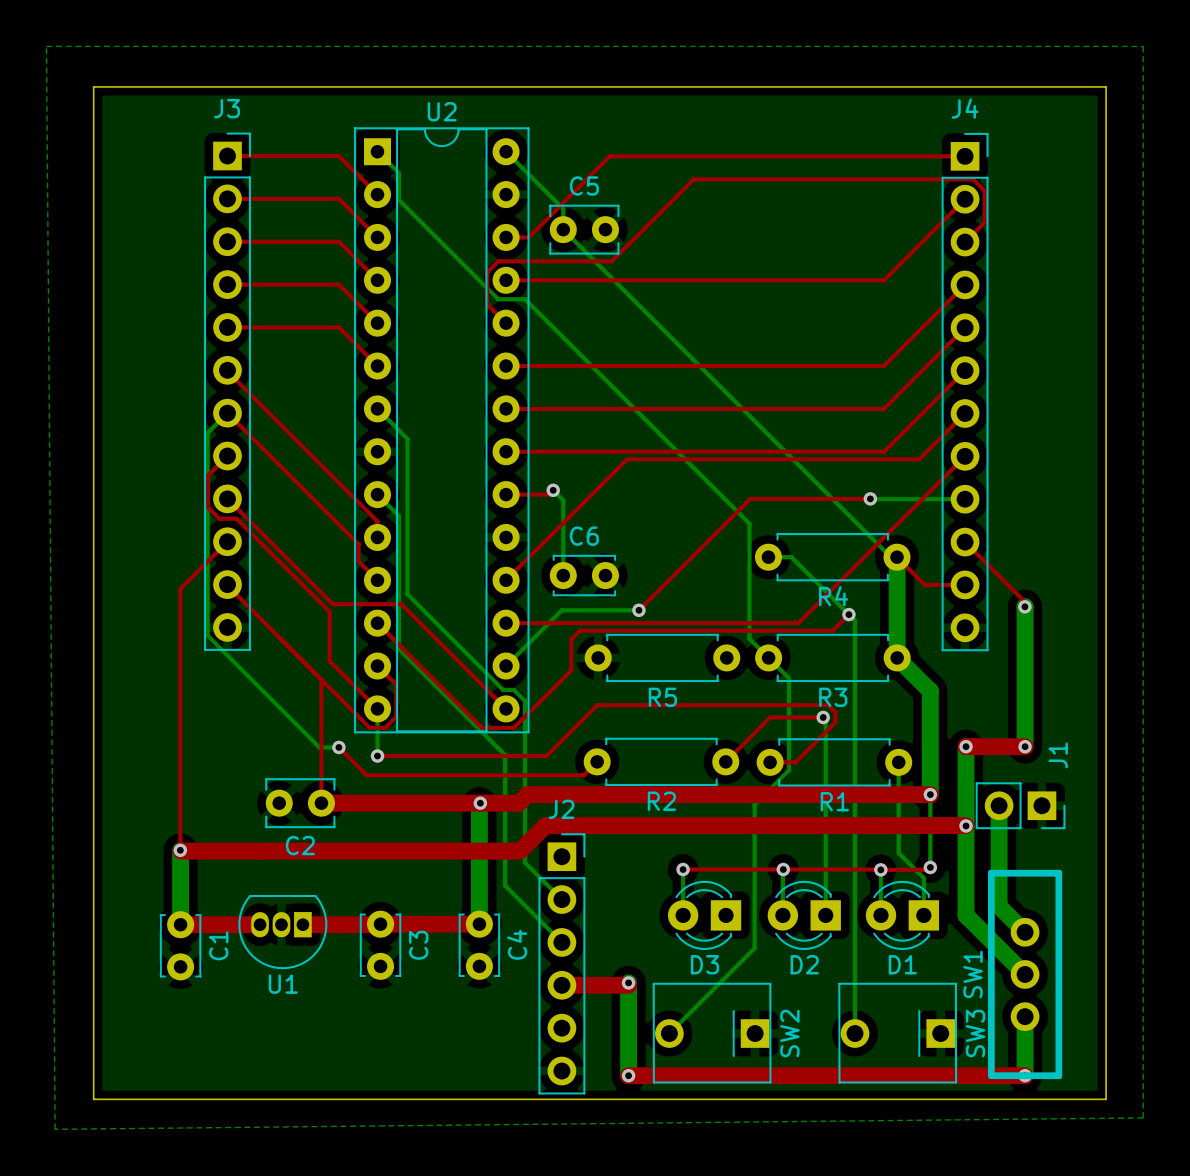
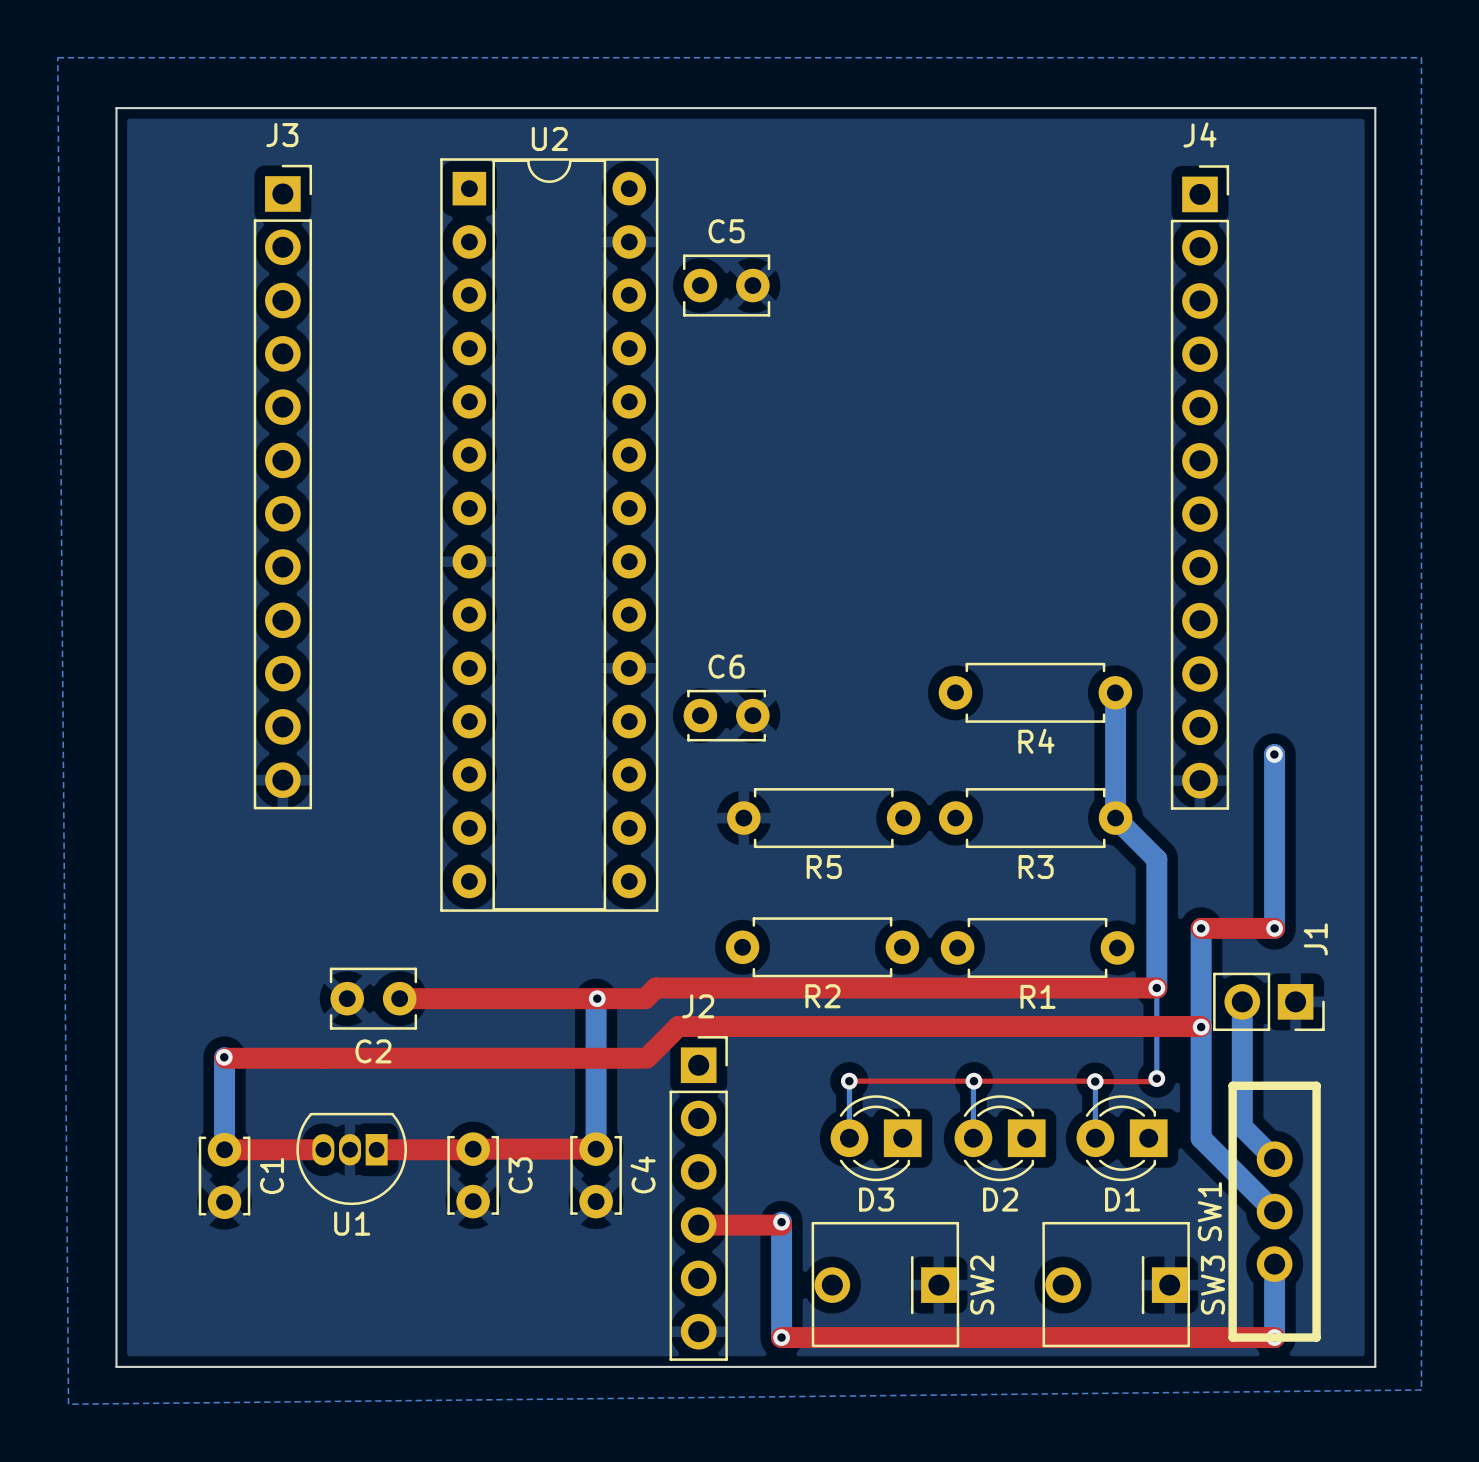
bottom track: (377, 151) (398, 173) (398, 199) (498, 299) (525, 299) (749, 523) (749, 638) (789, 678) (789, 770) (754, 804) (754, 948) (669, 1033) -> none
bottom track: (506, 151) (563, 208) (563, 229) (891, 557) (897, 557) -> none
top track: (227, 156) (338, 156) (377, 194) -> none
top track: (965, 156) (609, 156) (528, 237) (506, 237) -> none
top track: (227, 198) (338, 198) (377, 237) -> none
top track: (965, 199) (883, 280) (506, 280) -> none
top track: (227, 241) (338, 241) (377, 280) -> none
top track: (965, 242) (984, 222) (984, 191) (973, 179) (693, 179) (611, 261) (498, 261) (487, 272) (487, 304) (506, 323) -> none
top track: (227, 284) (338, 284) (377, 323) -> none
top track: (965, 284) (883, 366) (506, 366) -> none
top track: (227, 327) (338, 327) (377, 366) -> none
top track: (965, 327) (883, 408) (506, 408) -> none
top track: (227, 370) (377, 521) (377, 537) -> none
top track: (965, 370) (883, 451) (506, 451) -> none
bottom track: (377, 408) (407, 438) (407, 594) (503, 689) (513, 689) (525, 701) (525, 862) (561, 899) -> none
top track: (227, 413) (358, 544) (358, 561) (377, 580) -> none
bottom track: (227, 413) (207, 432) (207, 635) (319, 747) (338, 747) -> none
top track: (965, 413) (919, 459) (627, 459) (506, 580) -> none
top track: (227, 456) (207, 475) (207, 507) (219, 518) (236, 518) (329, 611) (329, 661) (377, 708) -> none
top track: (965, 456) (798, 623) (506, 623) -> none
top track: (553, 490) (548, 494) (506, 494) -> none
bottom track: (553, 490) (563, 500) (563, 575) -> none
via: (553, 490) -> none
bottom track: (377, 494) (398, 516) (398, 648) (505, 755) (505, 885) (561, 942) -> none
top track: (227, 498) (332, 604) (401, 604) (506, 708) -> none
top track: (870, 498) (750, 498) (638, 610) -> none
bottom track: (870, 498) (965, 499) -> none
via: (870, 498) -> none
top track: (227, 541) (180, 588) (180, 850) -> none
top track: (965, 542) (1024, 601) (1024, 606) -> none
bottom track: (768, 557) (791, 557) (855, 620) (855, 1033) -> none
top track: (897, 557) (924, 584) (965, 584) -> none
top track: (227, 584) (369, 727) (385, 727) (396, 716) (396, 685) (377, 666) -> none
bottom track: (638, 610) (561, 610) (506, 666) -> none
via: (638, 610) -> none
top track: (848, 614) (832, 630) (579, 630) (571, 639) (571, 670) (513, 727) (482, 727) (377, 623) -> none
via: (848, 614) -> none
top track: (321, 679) (321, 803) -> none
bottom track: (377, 708) (377, 756) -> none
top track: (823, 717) (770, 717) (725, 761) -> none
bottom track: (823, 717) (825, 719) (825, 915) -> none
via: (823, 717) -> none
top track: (338, 747) (366, 775) (583, 775) (597, 761) -> none
via: (338, 747) -> none
top track: (377, 756) (546, 756) (597, 705) (828, 705) (835, 712) (835, 722) (795, 762) (770, 762) -> none
via: (377, 756) -> none
bottom track: (898, 762) (898, 853) (923, 878) (923, 915) -> none

